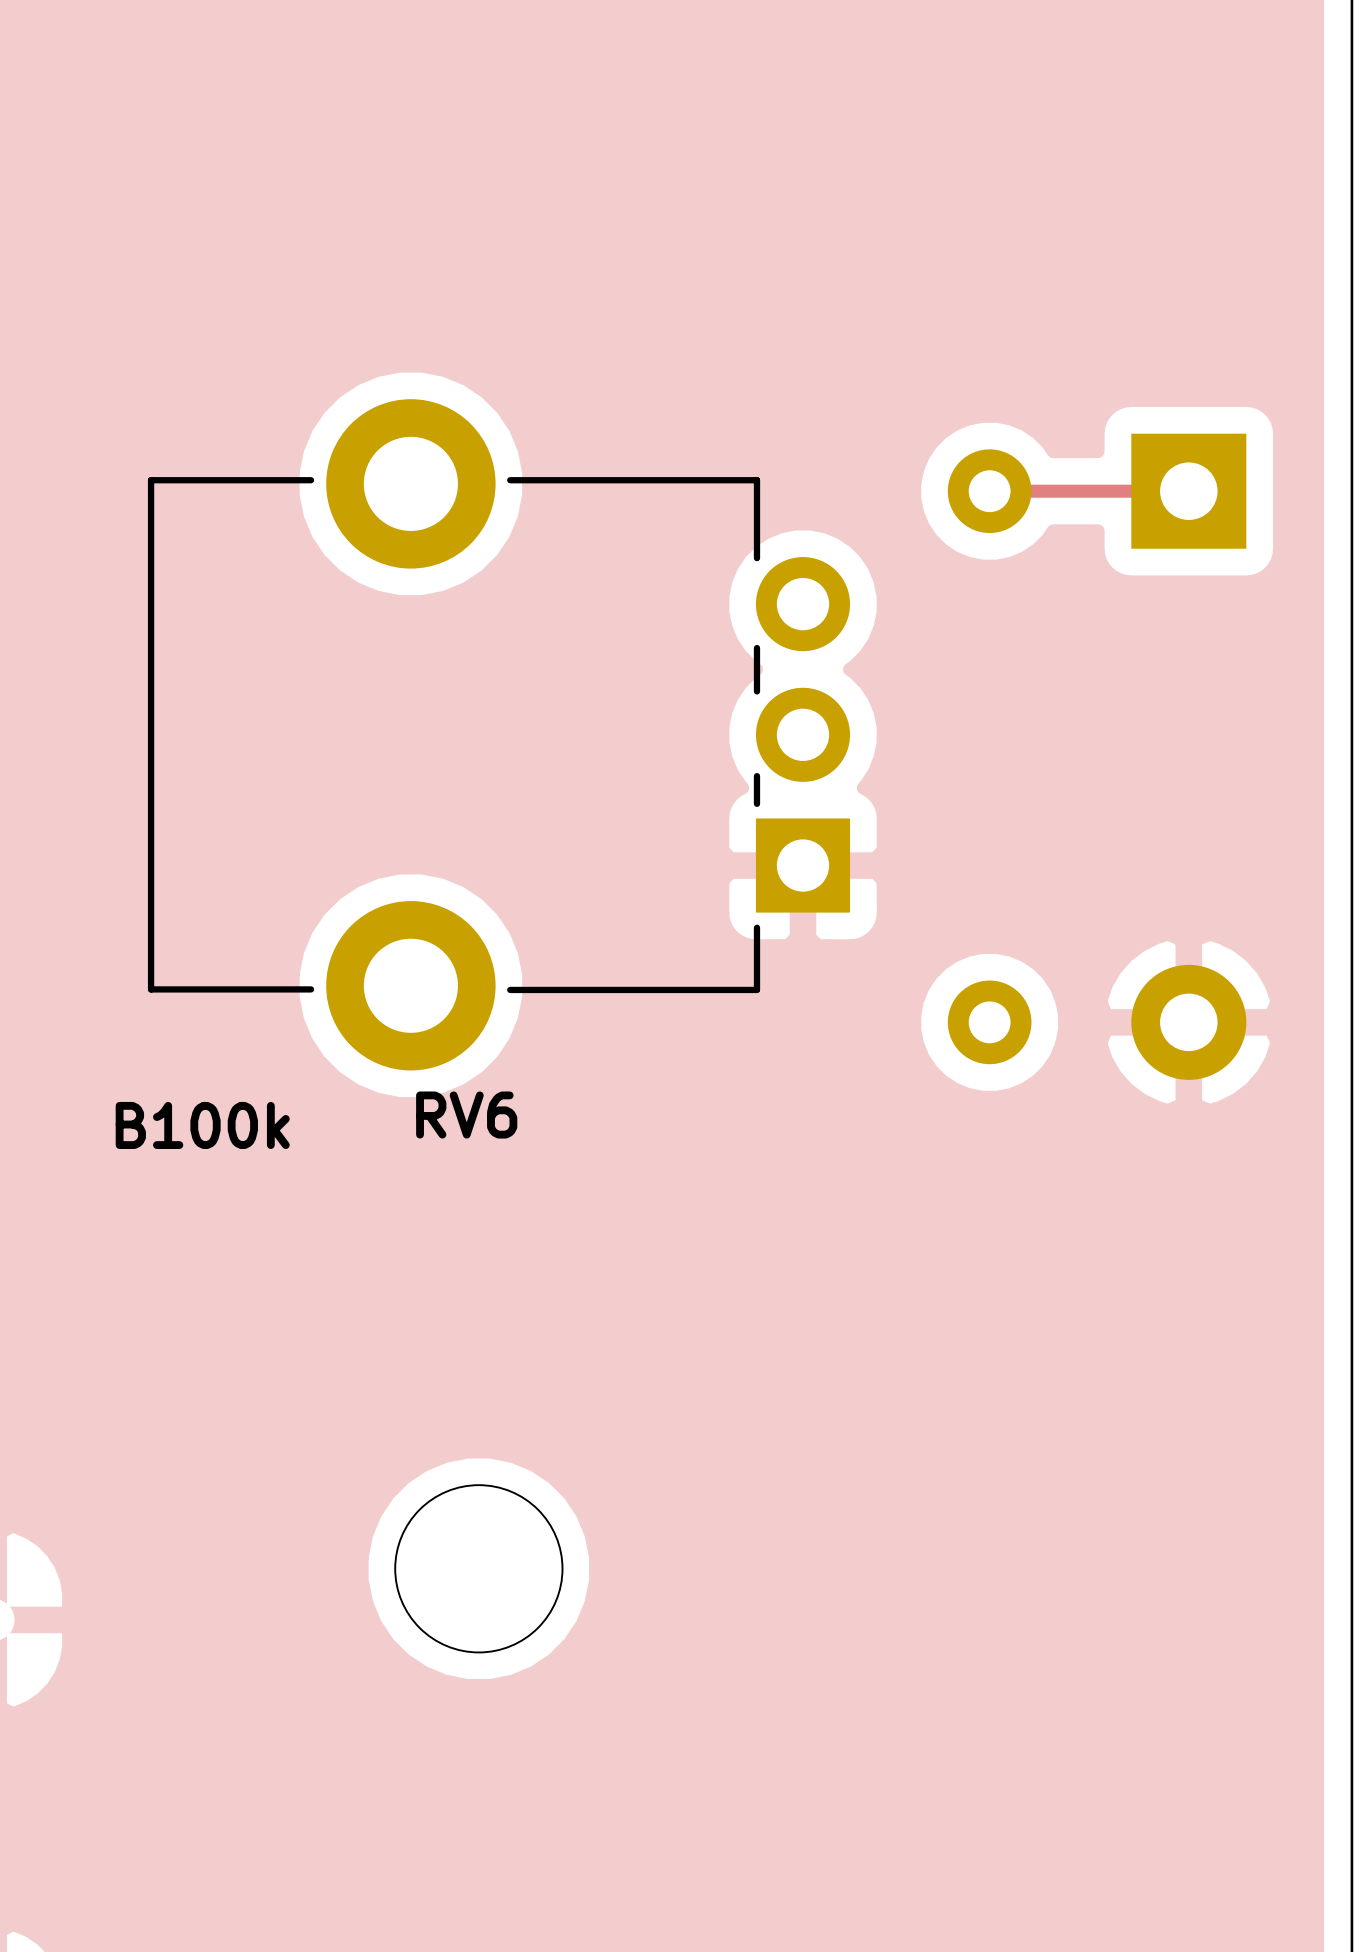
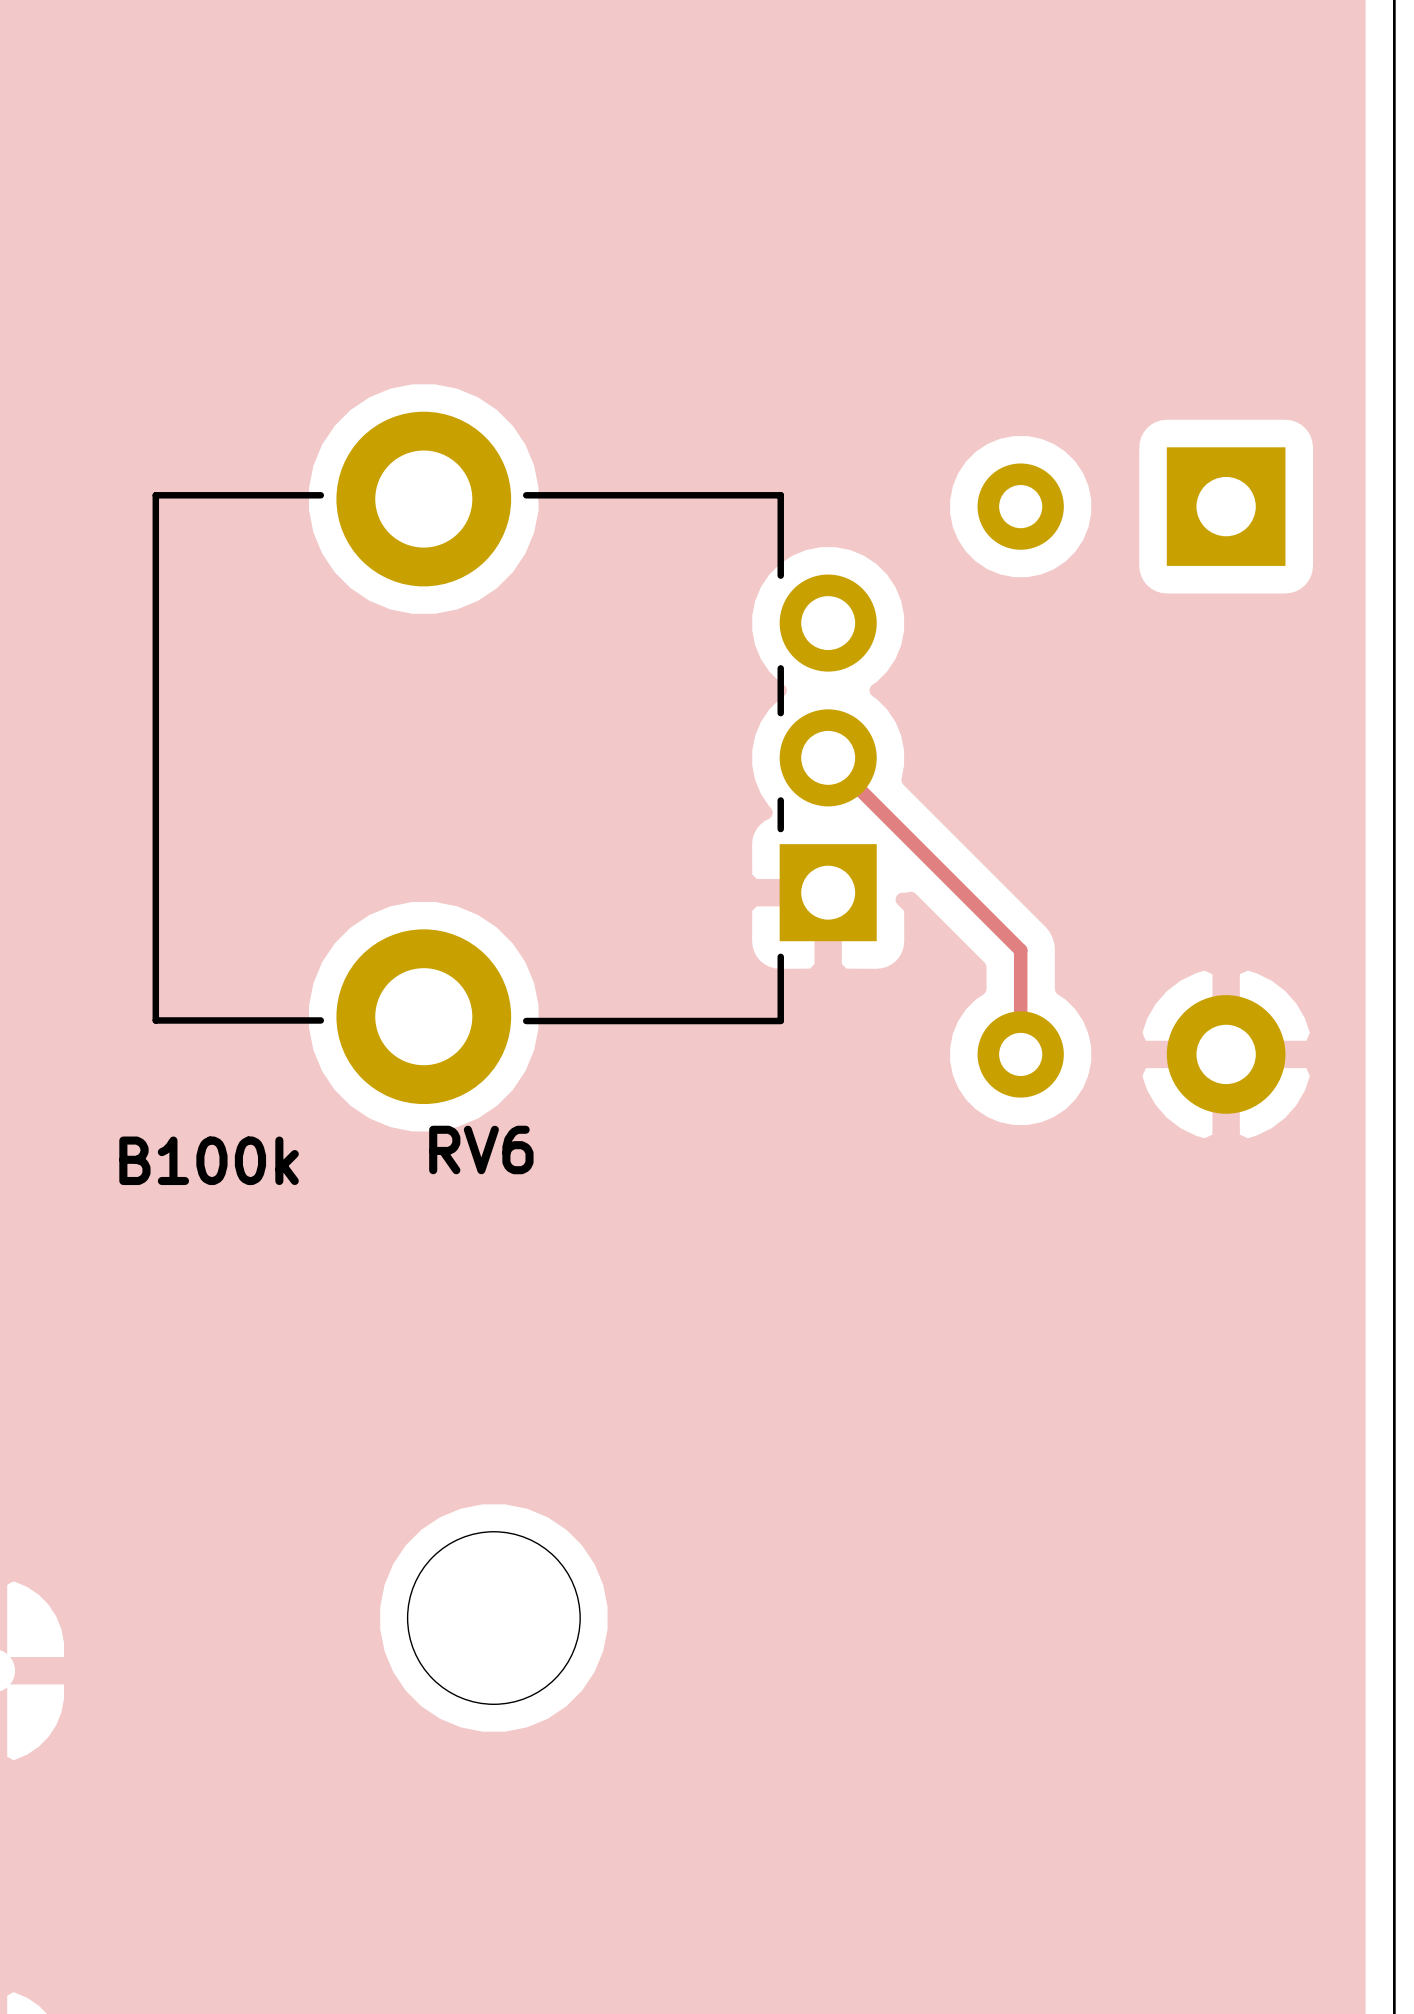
track: (989, 491) (1188, 491) -> none
track: none -> (828, 757) (1020, 950) (1020, 1054)

